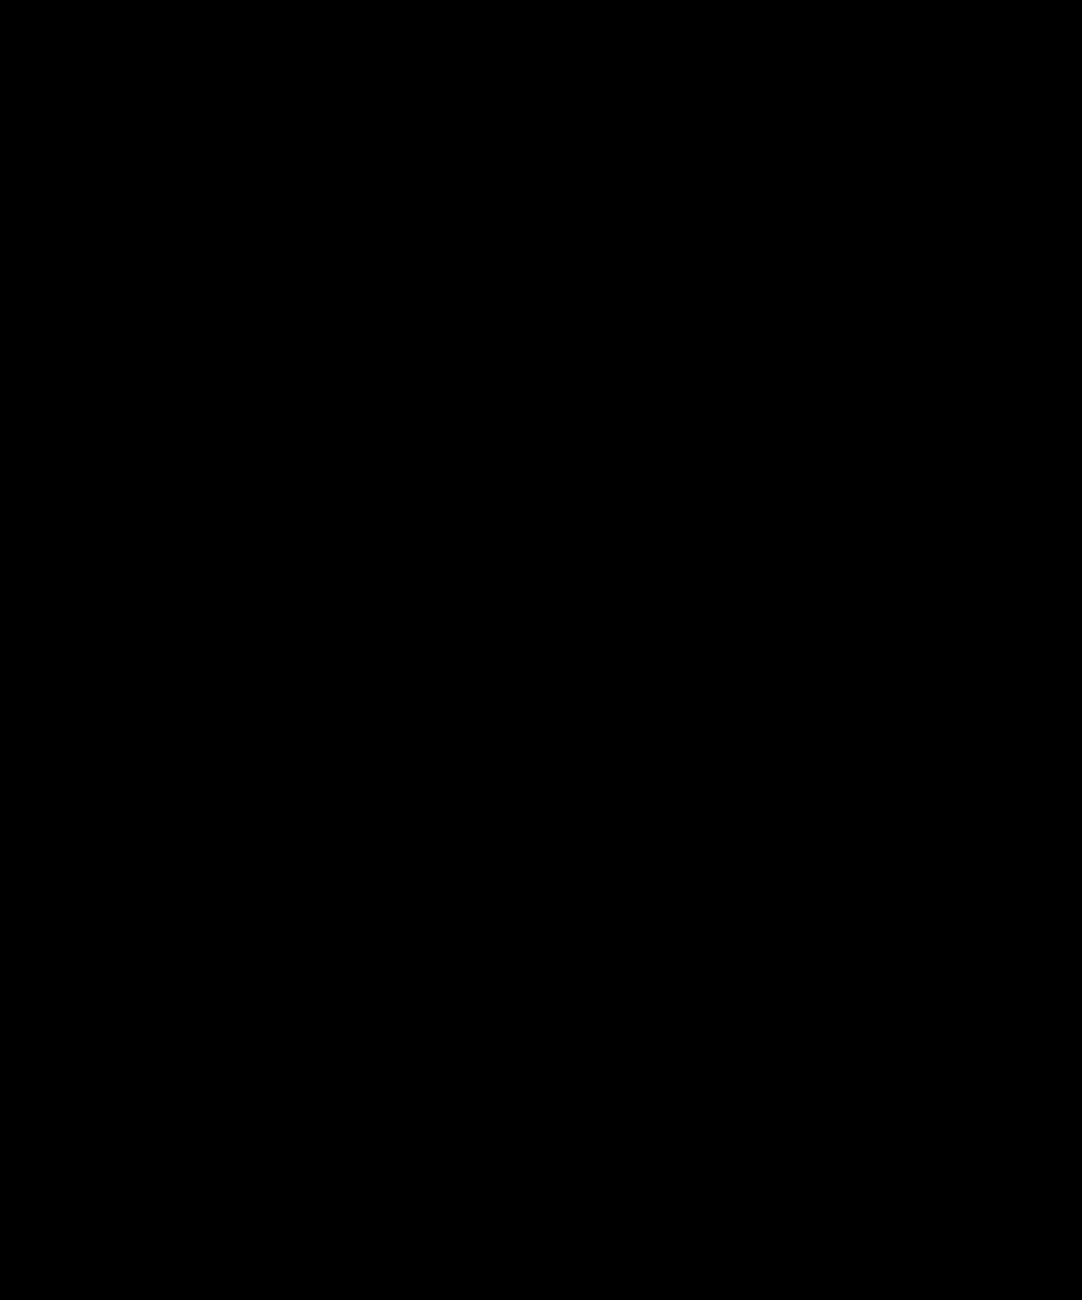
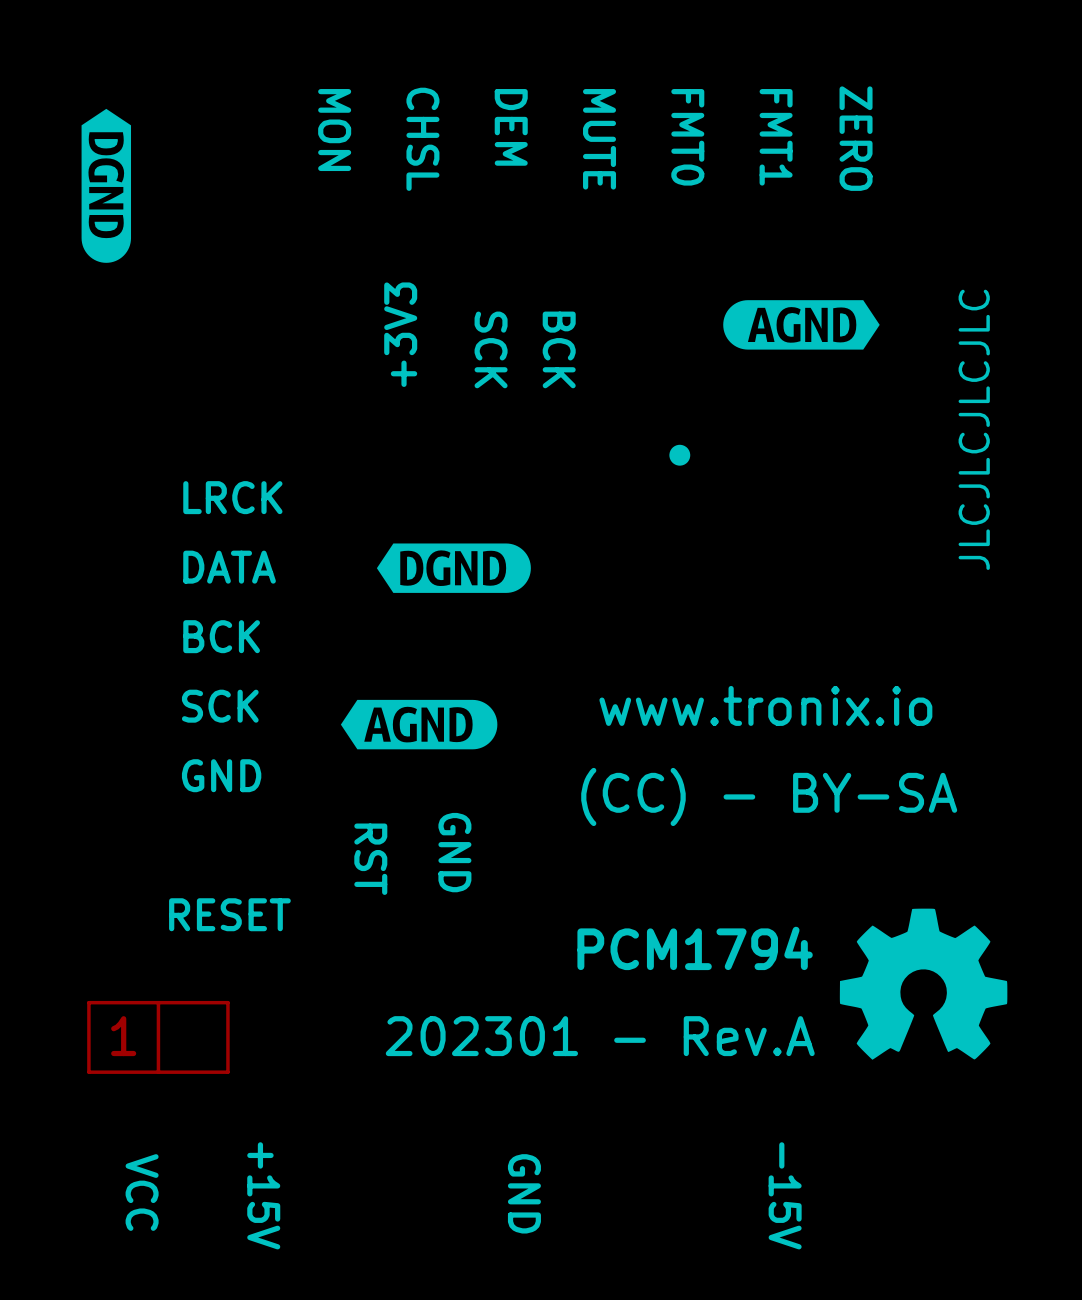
drawing: none -> [81, 108, 132, 263]
text: none -> DEM (511, 127)
text: none -> MON (334, 130)
text: none -> FMT0 (687, 137)
text: none -> FMT1 (776, 137)
text: none -> ZERO (856, 138)
text: none -> CHSL (422, 139)
text: none -> MUTE (599, 139)
drawing: none -> [723, 300, 880, 350]
text: none -> +3V3 (400, 334)
text: none -> SCK (491, 349)
text: none -> BCK (559, 349)
text: none -> JLCJLCJLCJLC (974, 429)
drawing: none -> [669, 444, 691, 466]
text: none -> LRCK (232, 497)
drawing: none -> [376, 543, 531, 593]
text: none -> DATA (229, 567)
text: none -> BCK (221, 636)
drawing: none -> [340, 699, 498, 750]
text: none -> www.tronix.io (765, 705)
text: none -> SCK (220, 706)
text: none -> GND (221, 775)
text: none -> (CC) - BY-SA (769, 796)
text: none -> GND (454, 852)
text: none -> RST (370, 859)
drawing: none -> [839, 908, 1008, 1060]
text: none -> RESET (229, 914)
text: none -> PCM1794 (695, 948)
track: none -> (88, 1002) (227, 1002) (227, 1072) (88, 1072) (88, 1002)
track: none -> (158, 1002) (158, 1072)
text: none -> 1 (123, 1036)
text: none -> 202301 - Rev.A (600, 1036)
text: none -> VCC (142, 1192)
text: none -> GND (524, 1193)
text: none -> +15V (263, 1195)
text: none -> -15V (785, 1195)

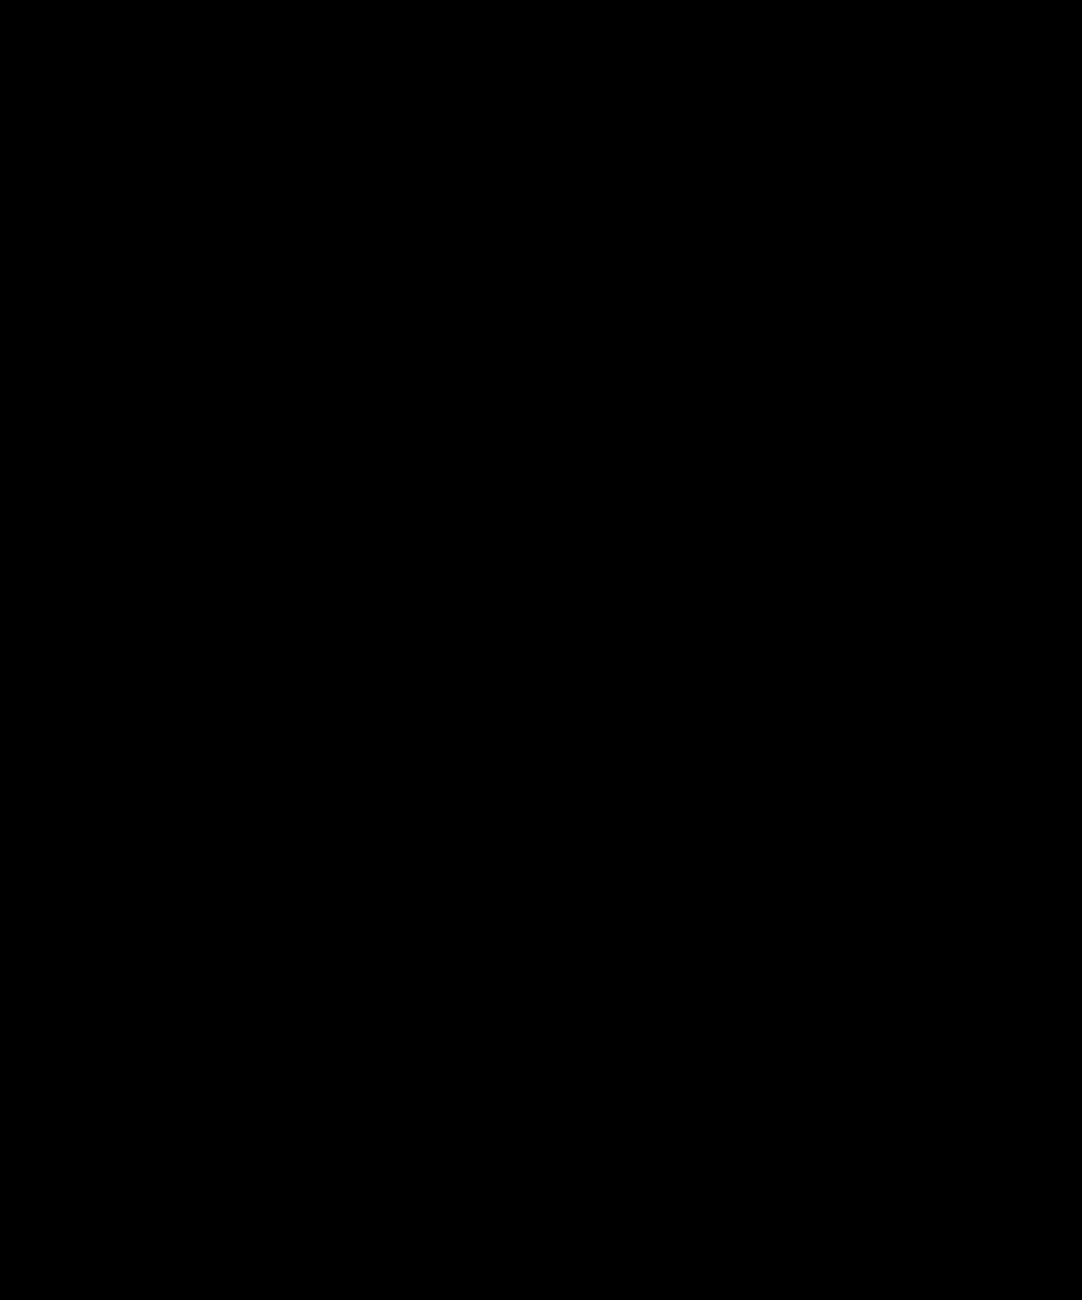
drawing: [81, 108, 132, 263] -> none
text: DEM (511, 127) -> none
text: MON (334, 130) -> none
text: FMT0 (687, 137) -> none
text: FMT1 (776, 137) -> none
text: ZERO (856, 138) -> none
text: CHSL (422, 139) -> none
text: MUTE (599, 139) -> none
drawing: [723, 300, 880, 350] -> none
text: +3V3 (400, 334) -> none
text: SCK (491, 349) -> none
text: BCK (559, 349) -> none
text: JLCJLCJLCJLC (974, 429) -> none
drawing: [669, 444, 691, 466] -> none
text: LRCK (232, 497) -> none
drawing: [376, 543, 531, 593] -> none
text: DATA (229, 567) -> none
text: BCK (221, 636) -> none
drawing: [340, 699, 498, 750] -> none
text: www.tronix.io (765, 705) -> none
text: SCK (220, 706) -> none
text: GND (221, 775) -> none
text: (CC) - BY-SA (769, 796) -> none
text: GND (454, 852) -> none
text: RST (370, 859) -> none
drawing: [839, 908, 1008, 1060] -> none
text: RESET (229, 914) -> none
text: PCM1794 (695, 948) -> none
track: (88, 1002) (227, 1002) (227, 1072) (88, 1072) (88, 1002) -> none
track: (158, 1002) (158, 1072) -> none
text: 1 (123, 1036) -> none
text: 202301 - Rev.A (600, 1036) -> none
text: VCC (142, 1192) -> none
text: GND (524, 1193) -> none
text: +15V (263, 1195) -> none
text: -15V (785, 1195) -> none

